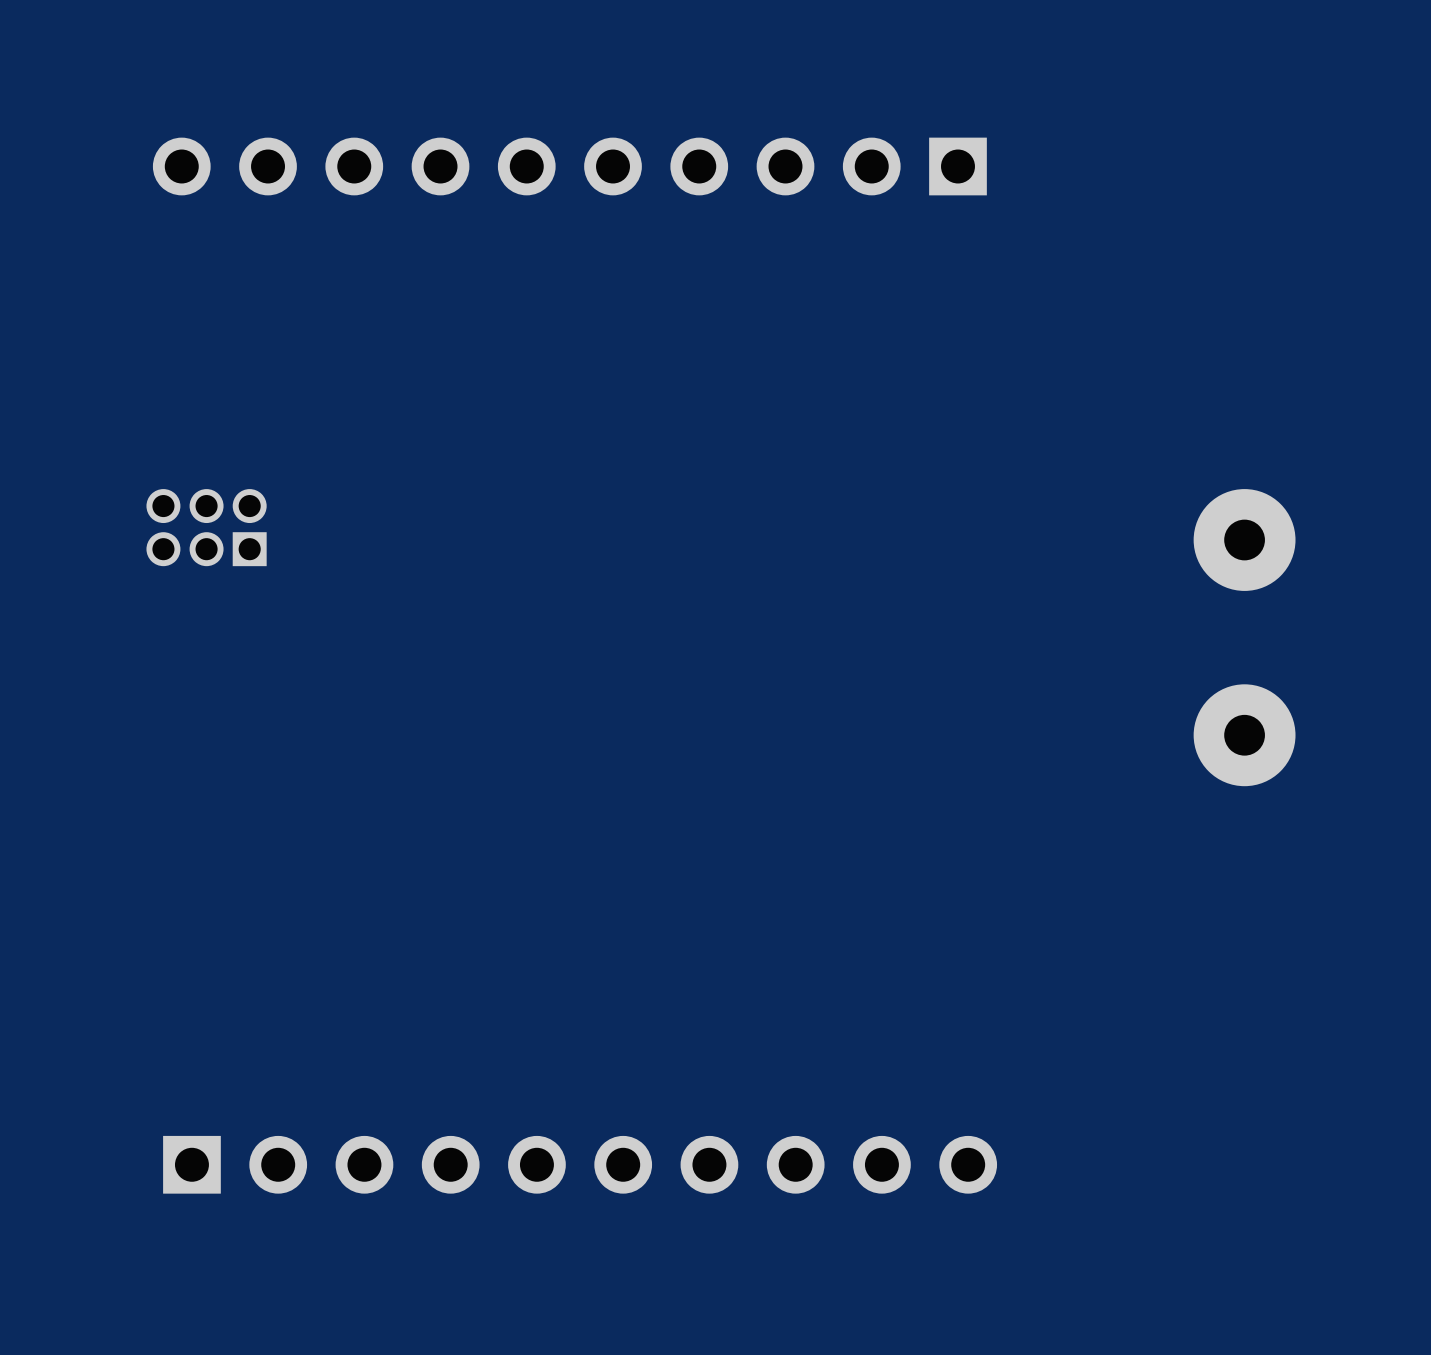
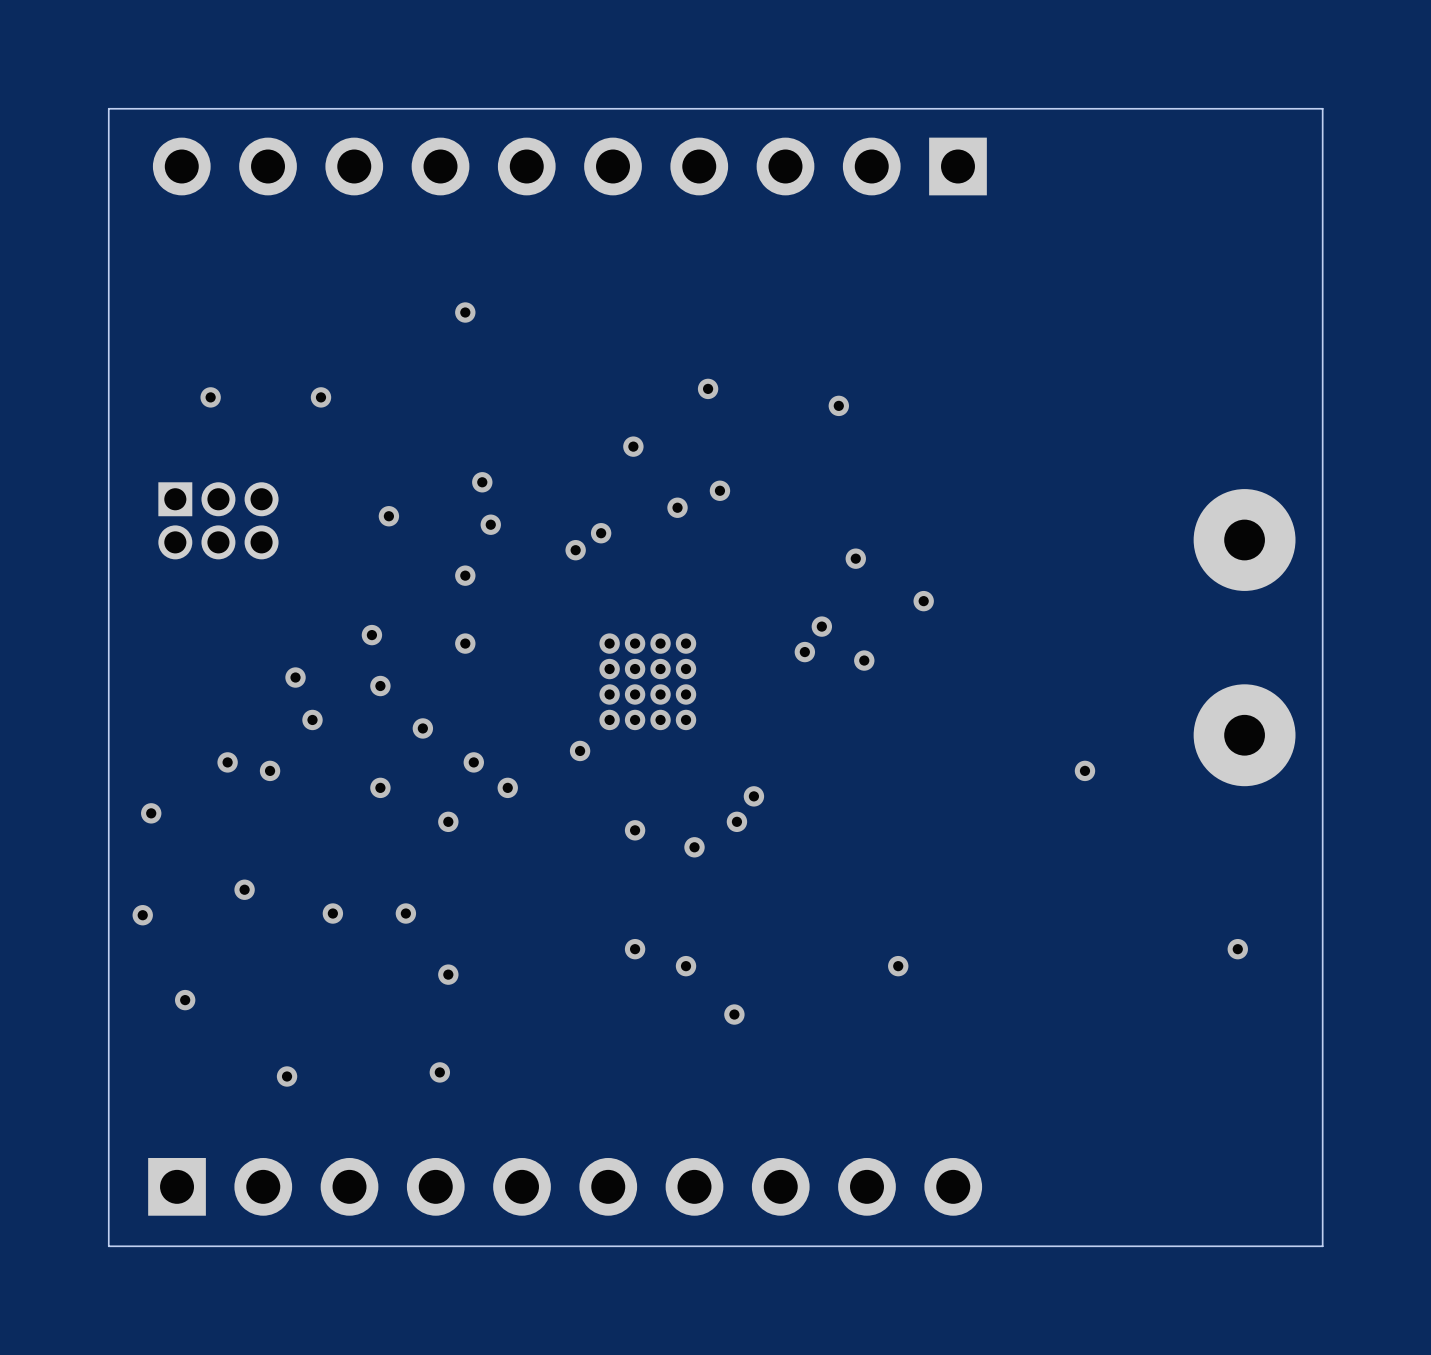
board edge: none -> (1322, 108) (108, 108) (108, 1246) (1322, 1246) (1322, 108)
via: none -> (465, 312)
via: none -> (708, 388)
via: none -> (210, 397)
via: none -> (320, 397)
via: none -> (838, 405)
via: none -> (633, 446)
via: none -> (482, 482)
via: none -> (719, 490)
via: none -> (677, 507)
via: none -> (388, 516)
via: none -> (490, 524)
part rotation: 0° (206, 527) -> 180° (218, 520)
via: none -> (601, 533)
via: none -> (575, 550)
via: none -> (855, 558)
via: none -> (465, 575)
via: none -> (923, 601)
via: none -> (821, 626)
via: none -> (371, 635)
via: none -> (465, 643)
via: none -> (609, 643)
via: none -> (635, 643)
via: none -> (660, 643)
via: none -> (686, 643)
via: none -> (804, 652)
via: none -> (864, 660)
via: none -> (609, 669)
via: none -> (635, 669)
via: none -> (660, 669)
via: none -> (686, 669)
via: none -> (295, 677)
via: none -> (380, 686)
via: none -> (609, 694)
via: none -> (635, 694)
via: none -> (660, 694)
via: none -> (686, 694)
via: none -> (312, 719)
via: none -> (609, 719)
via: none -> (635, 719)
via: none -> (660, 719)
via: none -> (686, 719)
via: none -> (422, 728)
via: none -> (580, 750)
via: none -> (227, 762)
via: none -> (473, 762)
via: none -> (270, 770)
via: none -> (1084, 770)
via: none -> (380, 787)
via: none -> (507, 787)
via: none -> (753, 796)
via: none -> (151, 813)
via: none -> (448, 821)
via: none -> (736, 821)
via: none -> (635, 830)
via: none -> (694, 847)
via: none -> (244, 889)
via: none -> (332, 913)
via: none -> (405, 913)
via: none -> (142, 915)
via: none -> (635, 949)
via: none -> (1237, 949)
via: none -> (686, 966)
via: none -> (898, 966)
via: none -> (448, 974)
via: none -> (185, 1000)
via: none -> (734, 1014)
via: none -> (439, 1072)
via: none -> (287, 1076)
part position: (580, 1164) -> (565, 1186)

